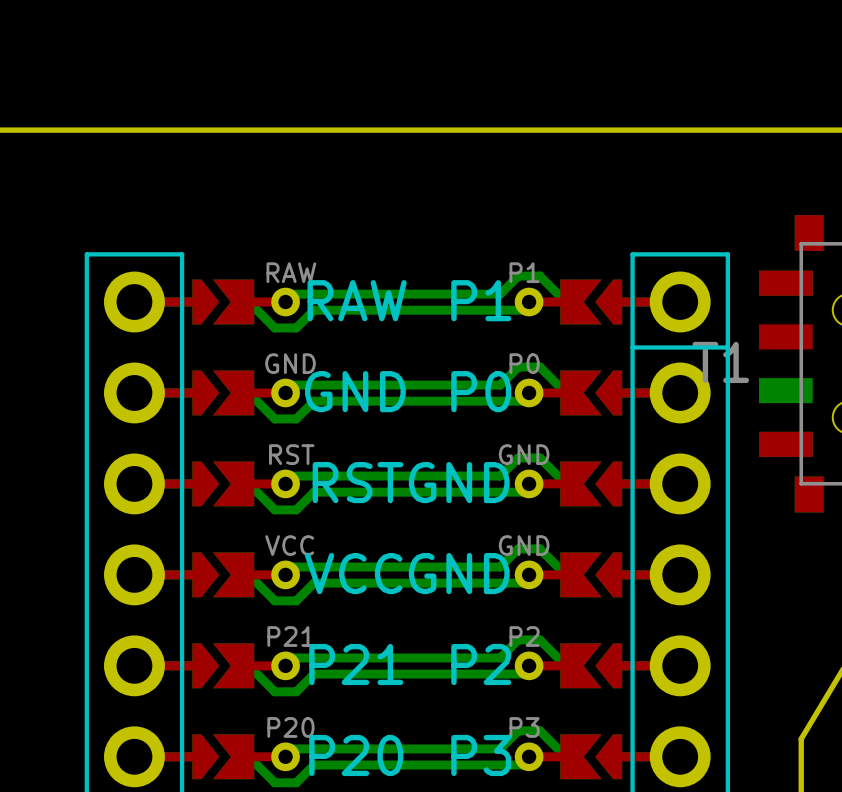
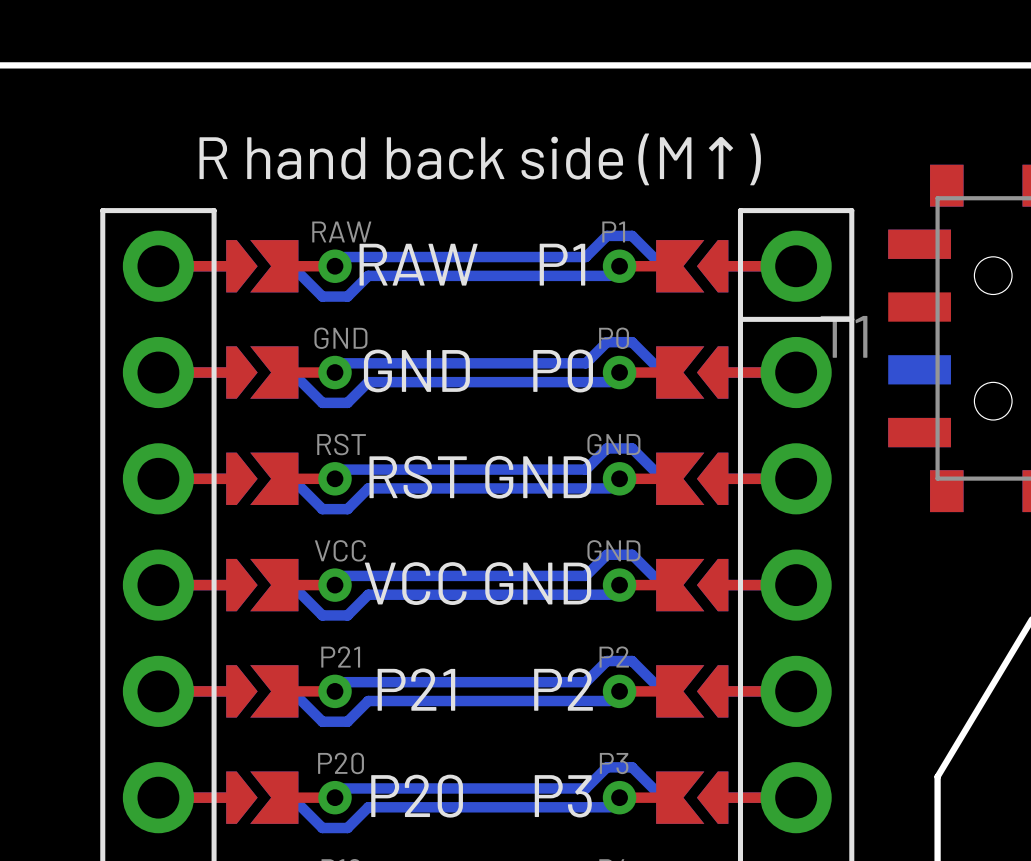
part text: none -> R hand back side (M↑) (480, 159)

